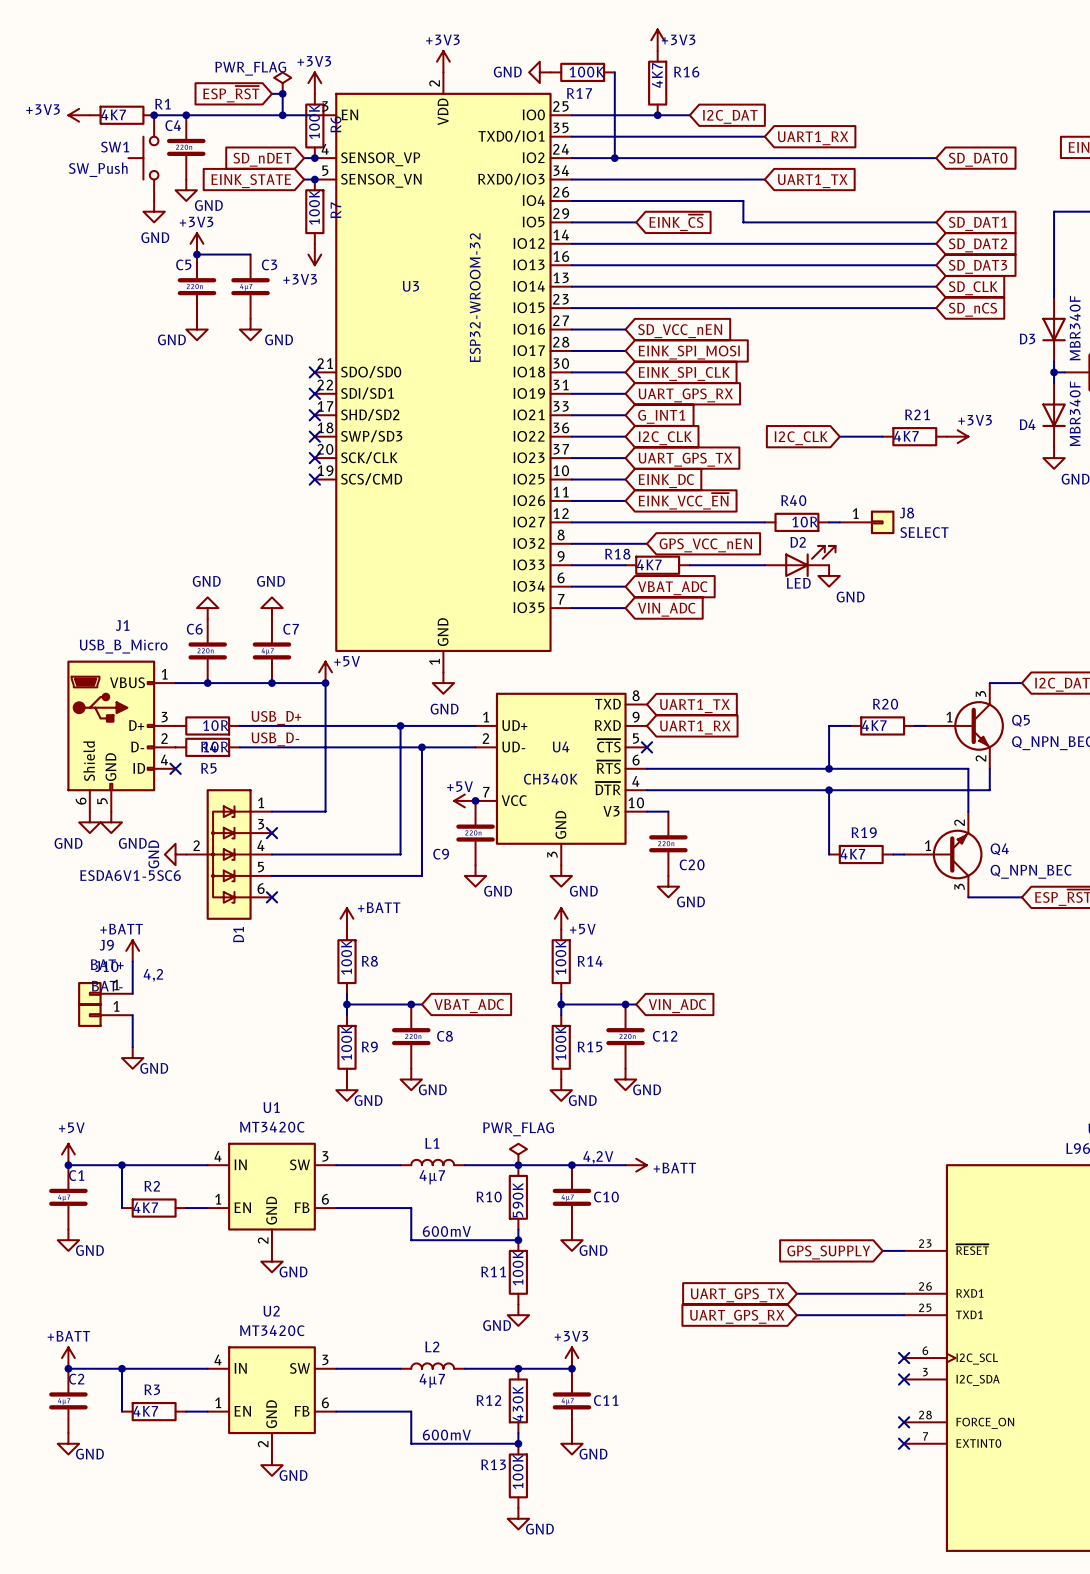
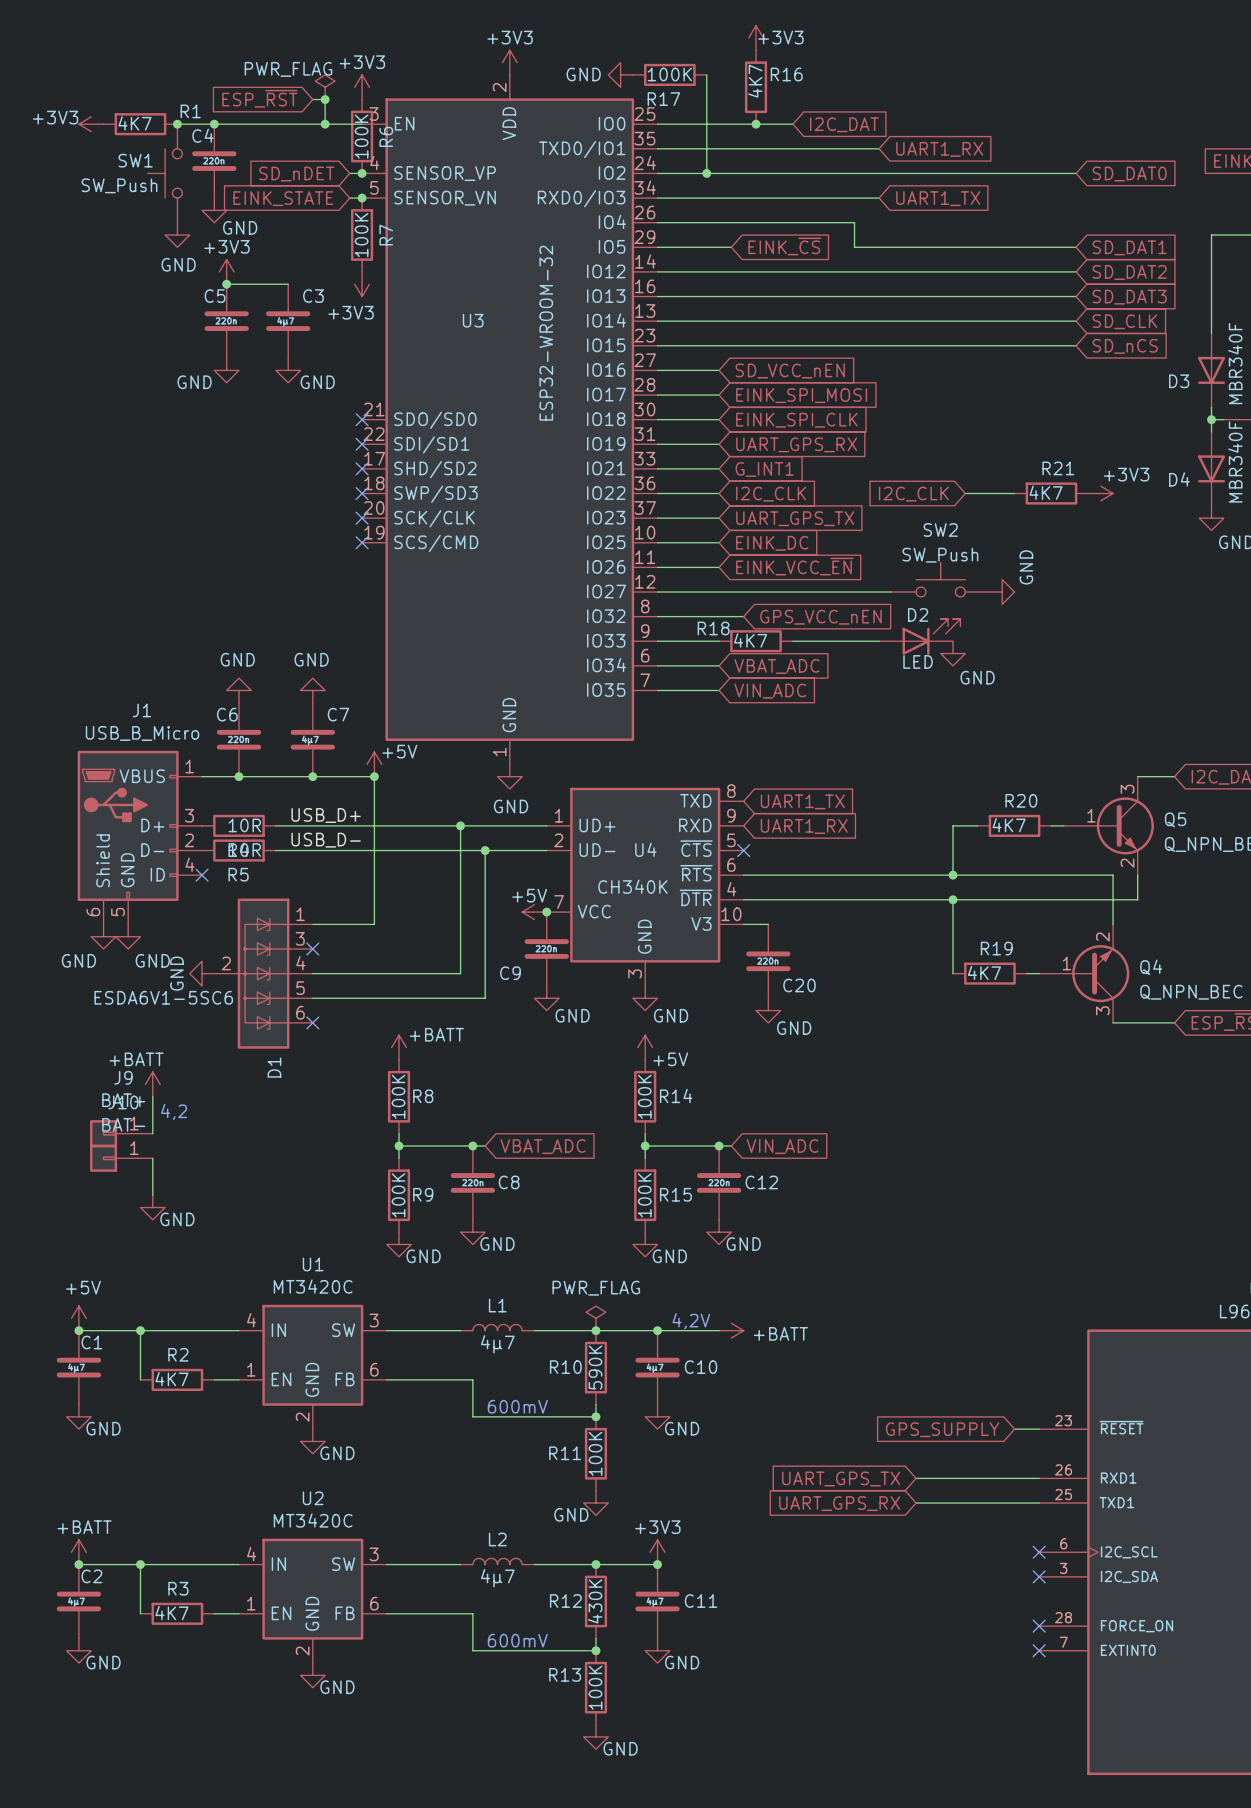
SW2: none -> SW_Push (940, 579)
R40: 10R (796, 522) -> none
J8: SELECT (867, 522) -> none
power symbol: none -> GND (1002, 592)

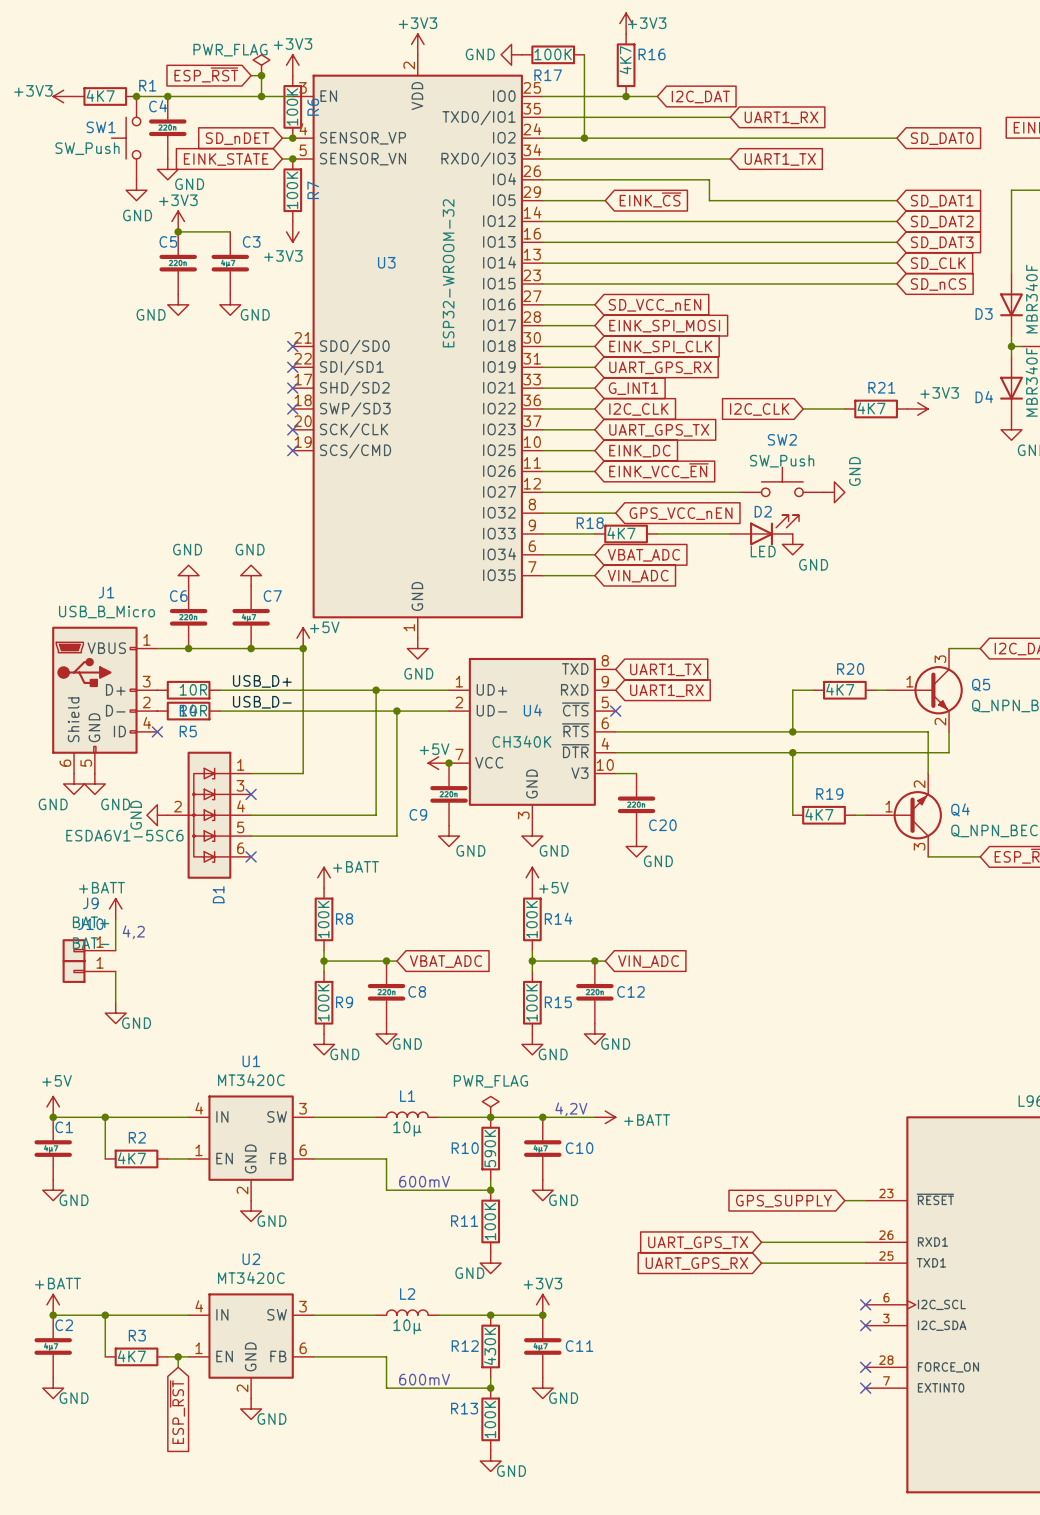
L1 value: 4µ7 (497, 1344) -> 10µ (407, 1129)
L2 value: 4µ7 (497, 1578) -> 10µ (407, 1326)
wire: none -> (178, 1356) (178, 1367)
junction: none -> (178, 1356)
global label: none -> ESP_~{RST} (177, 1412)

